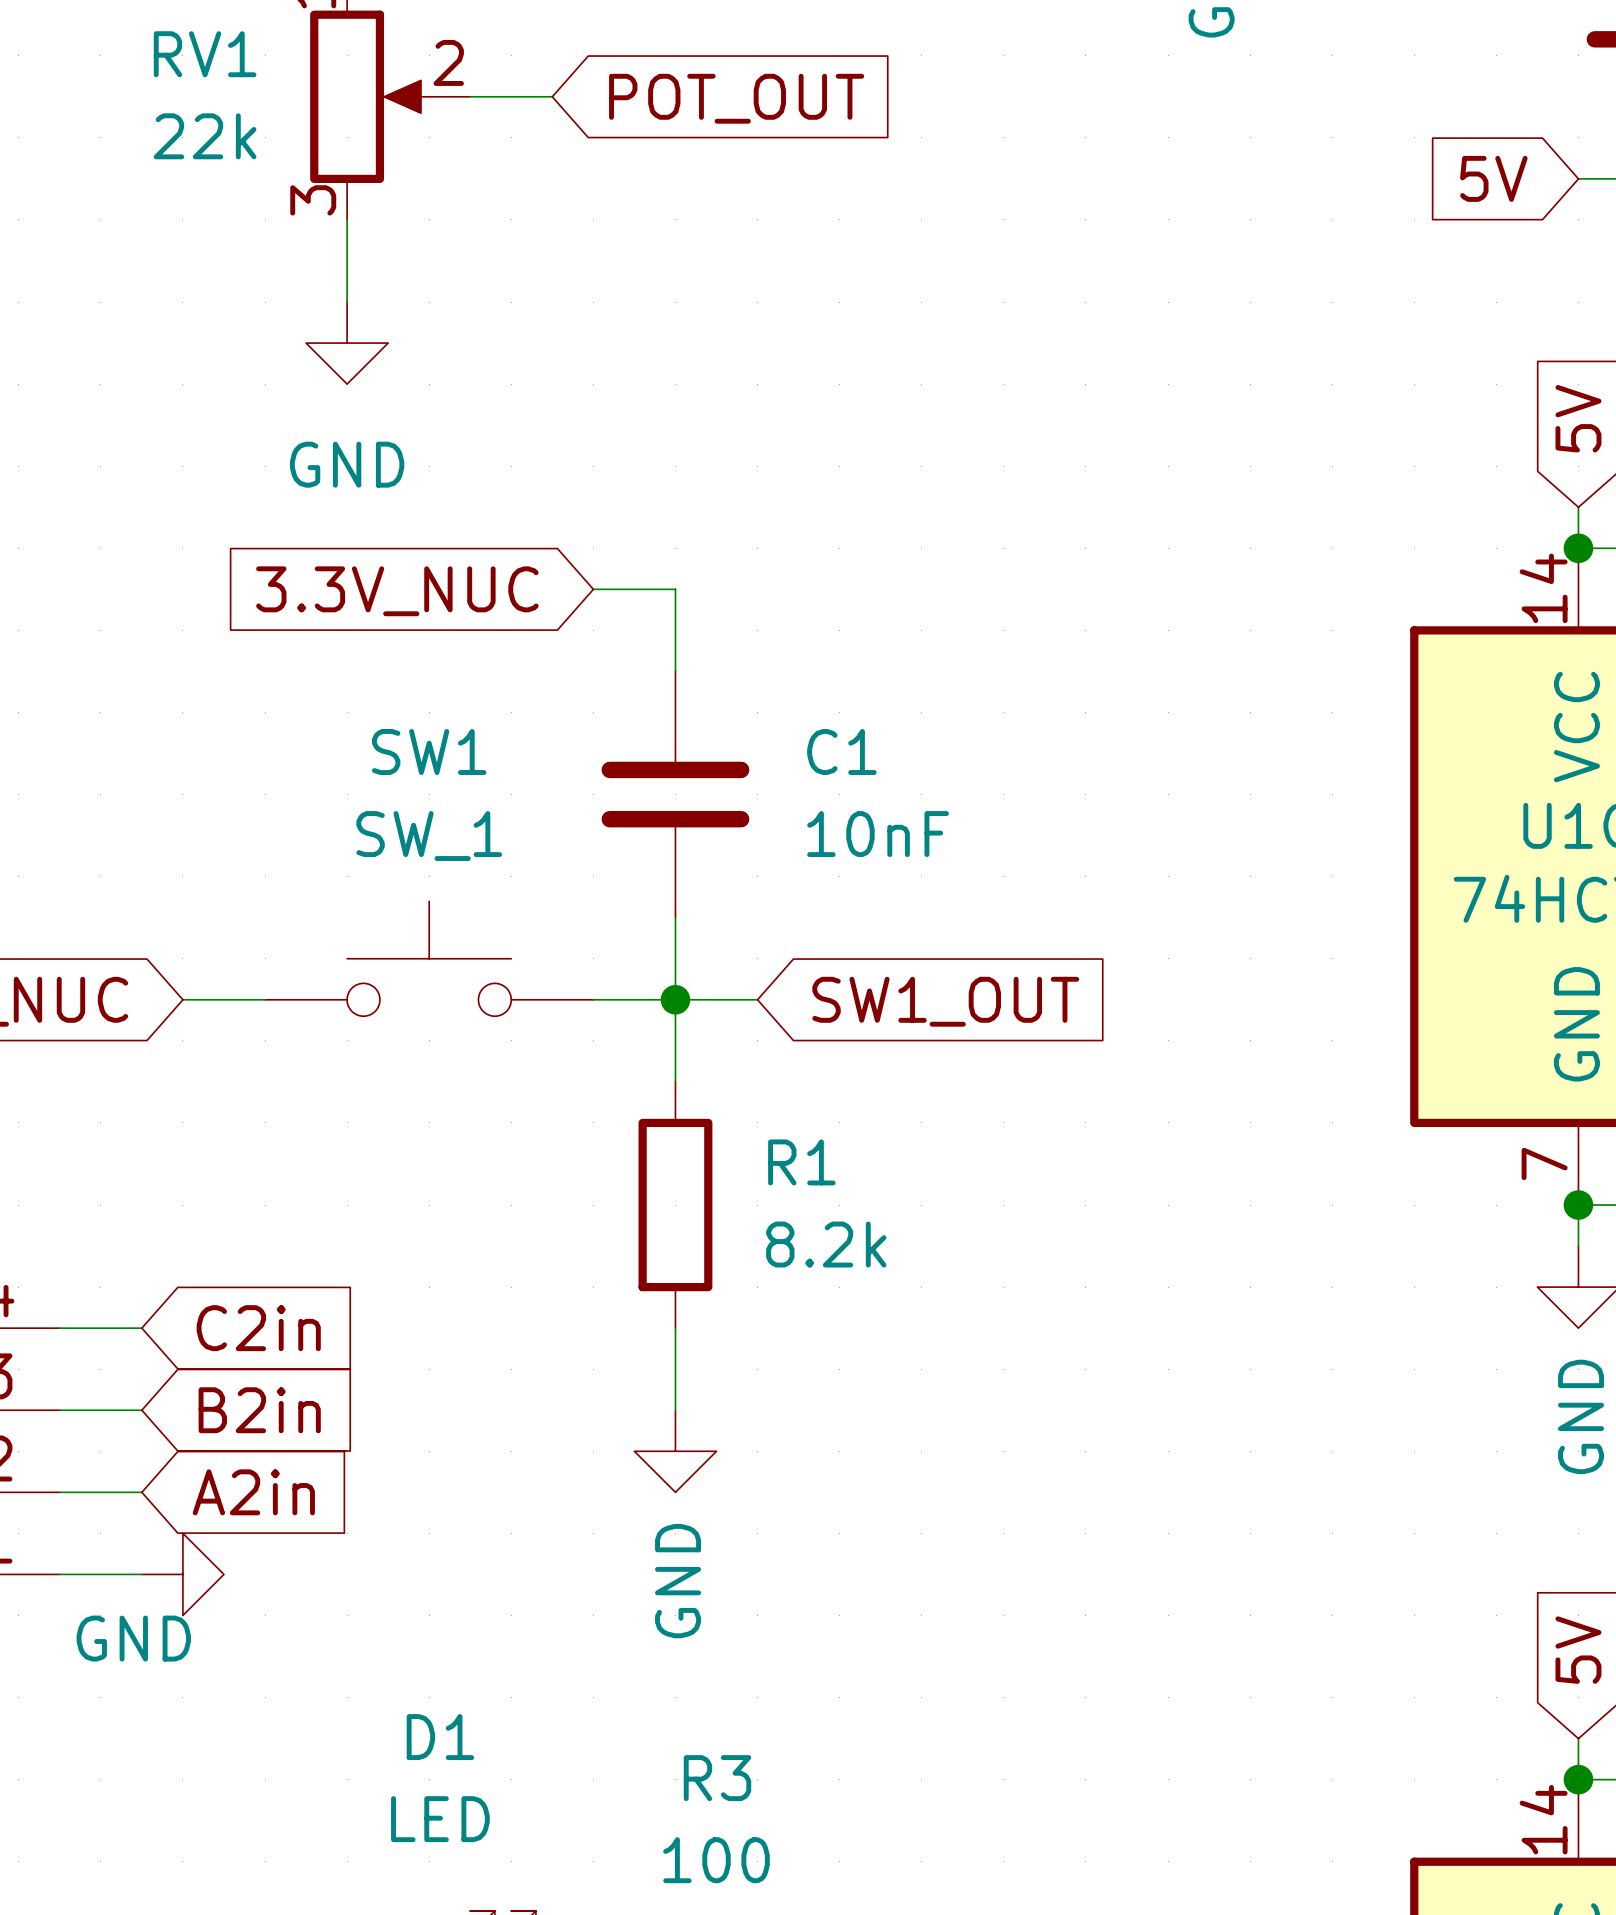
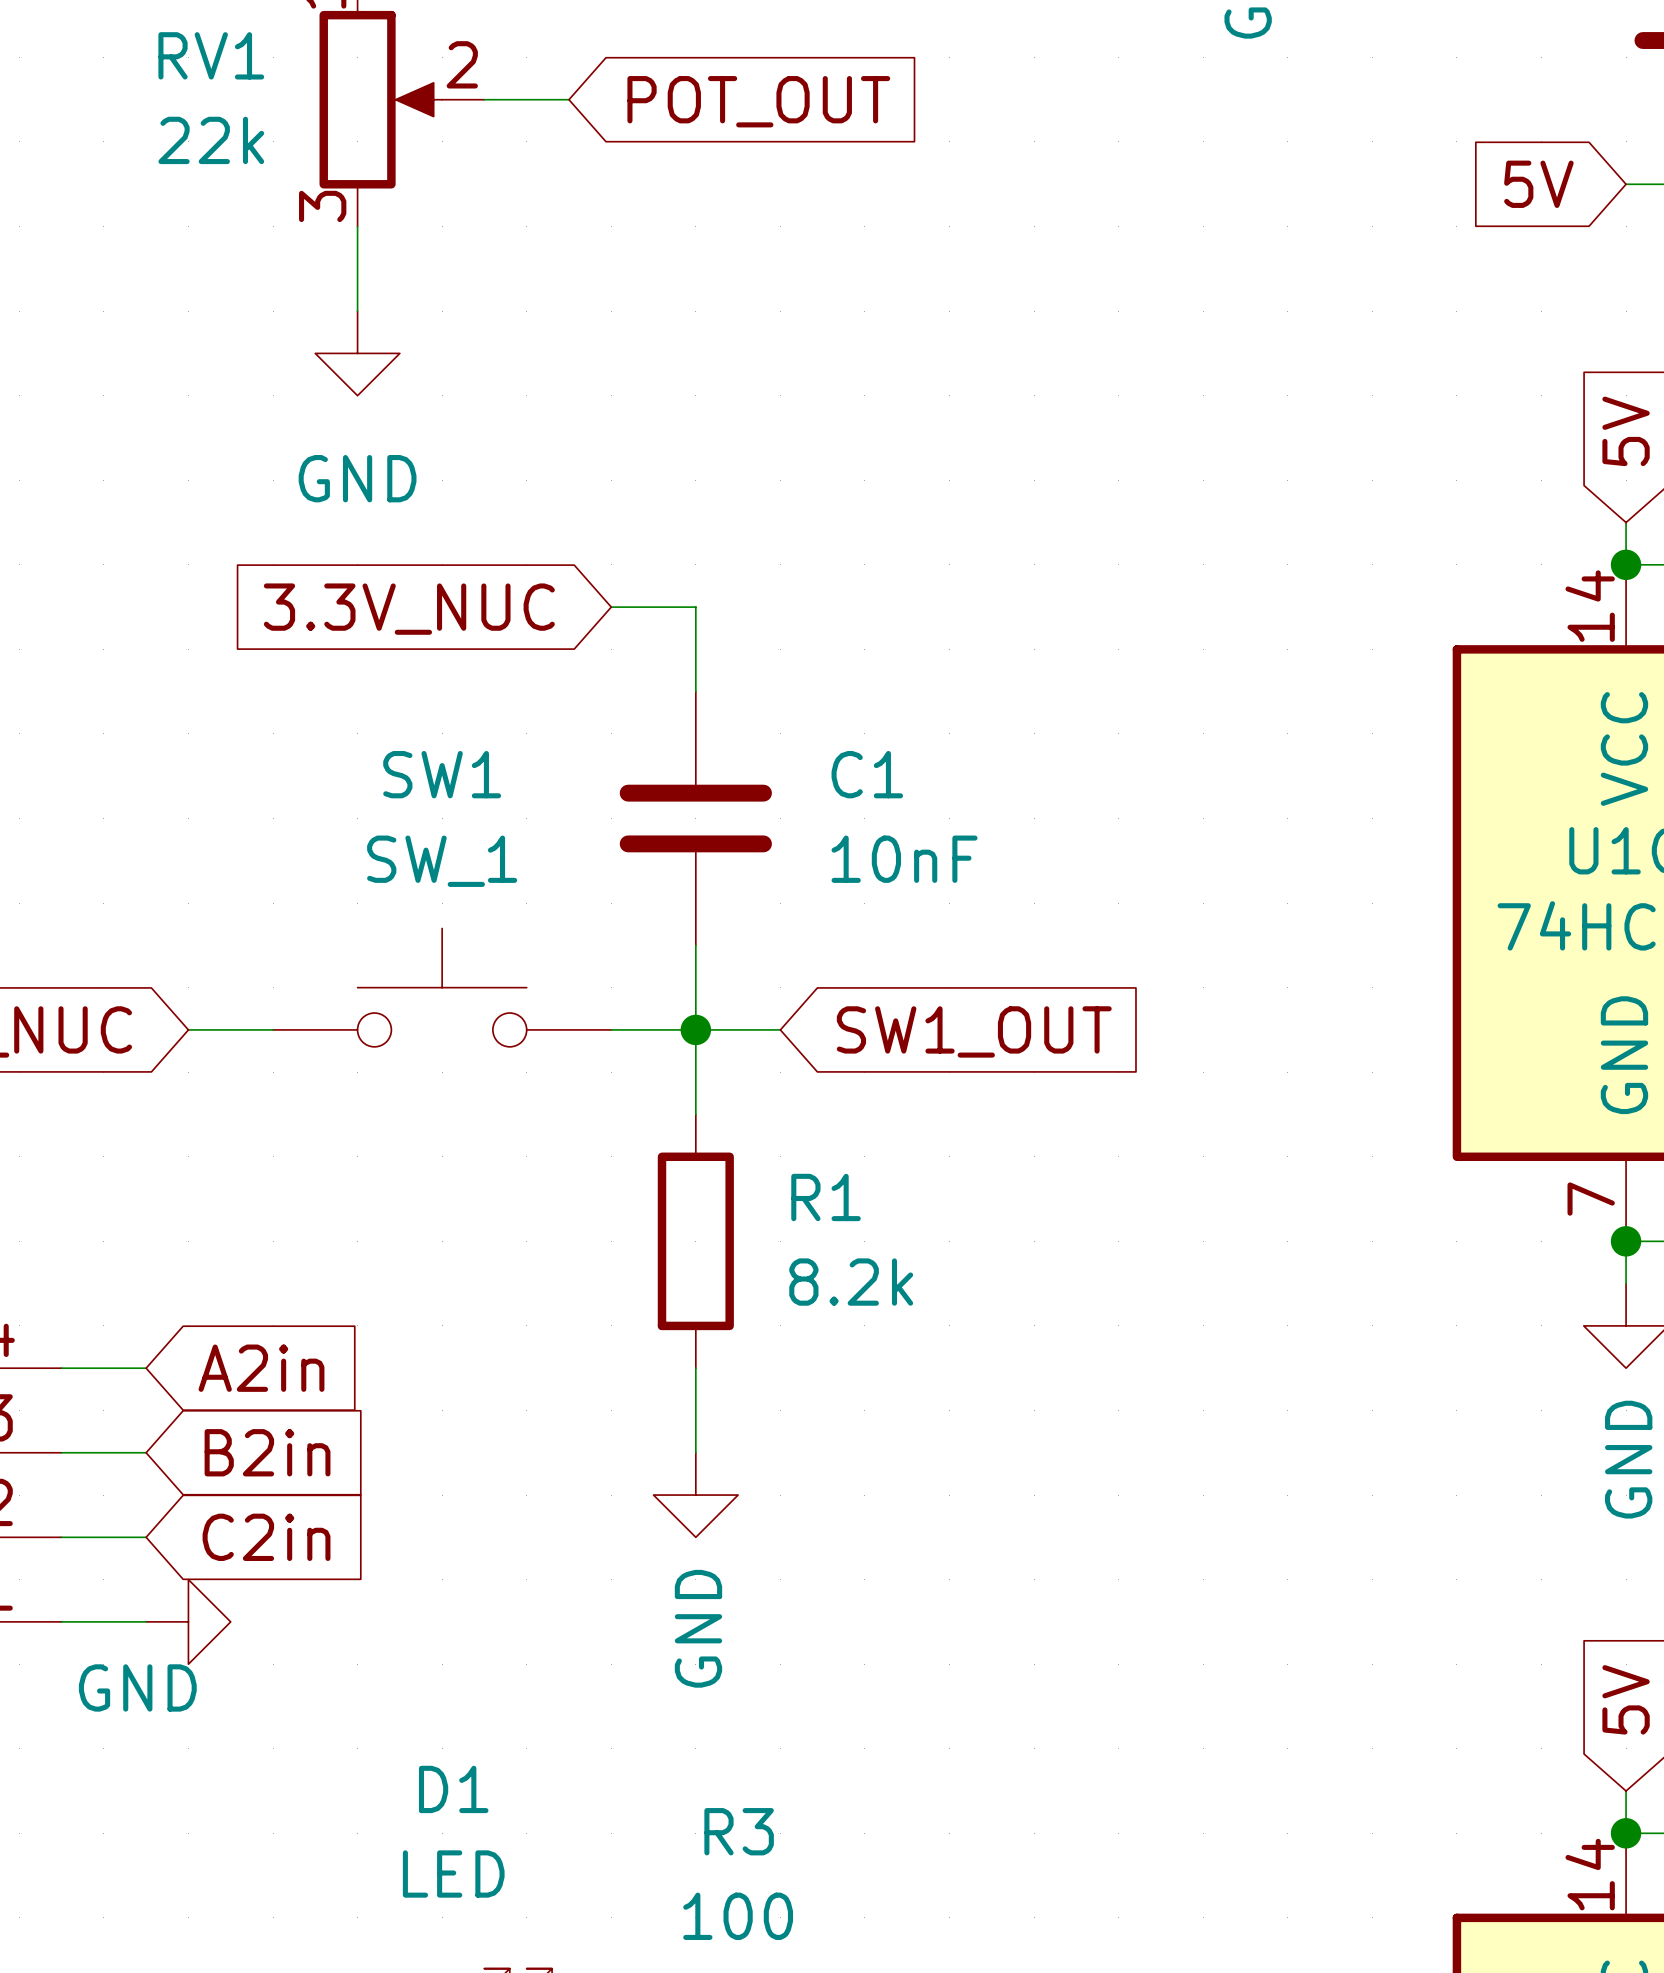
global label: C2in (258, 1328) -> A2in (261, 1368)
global label: A2in (253, 1492) -> C2in (266, 1537)

